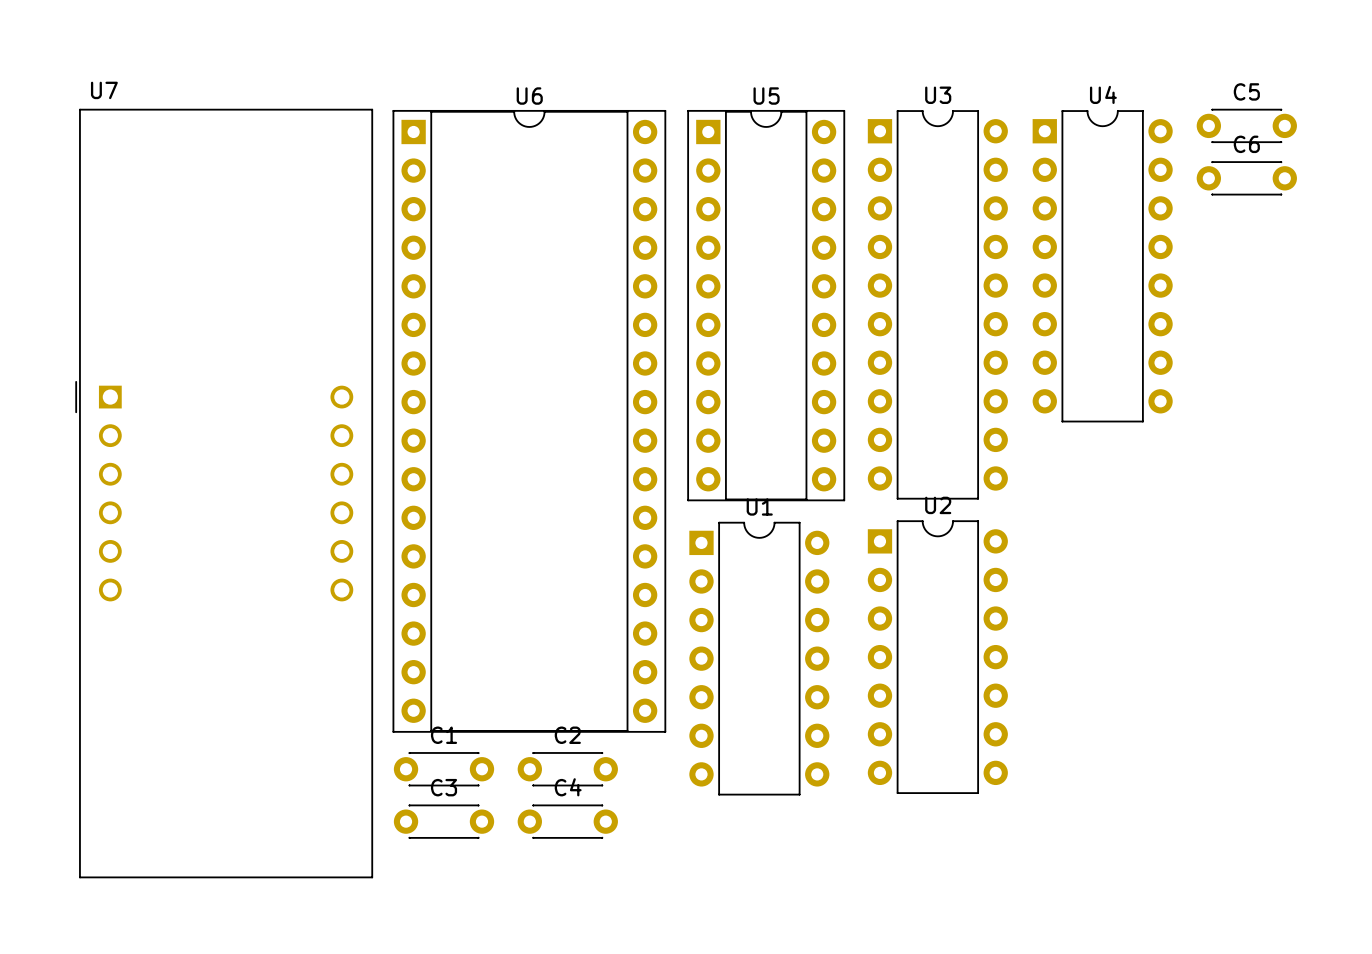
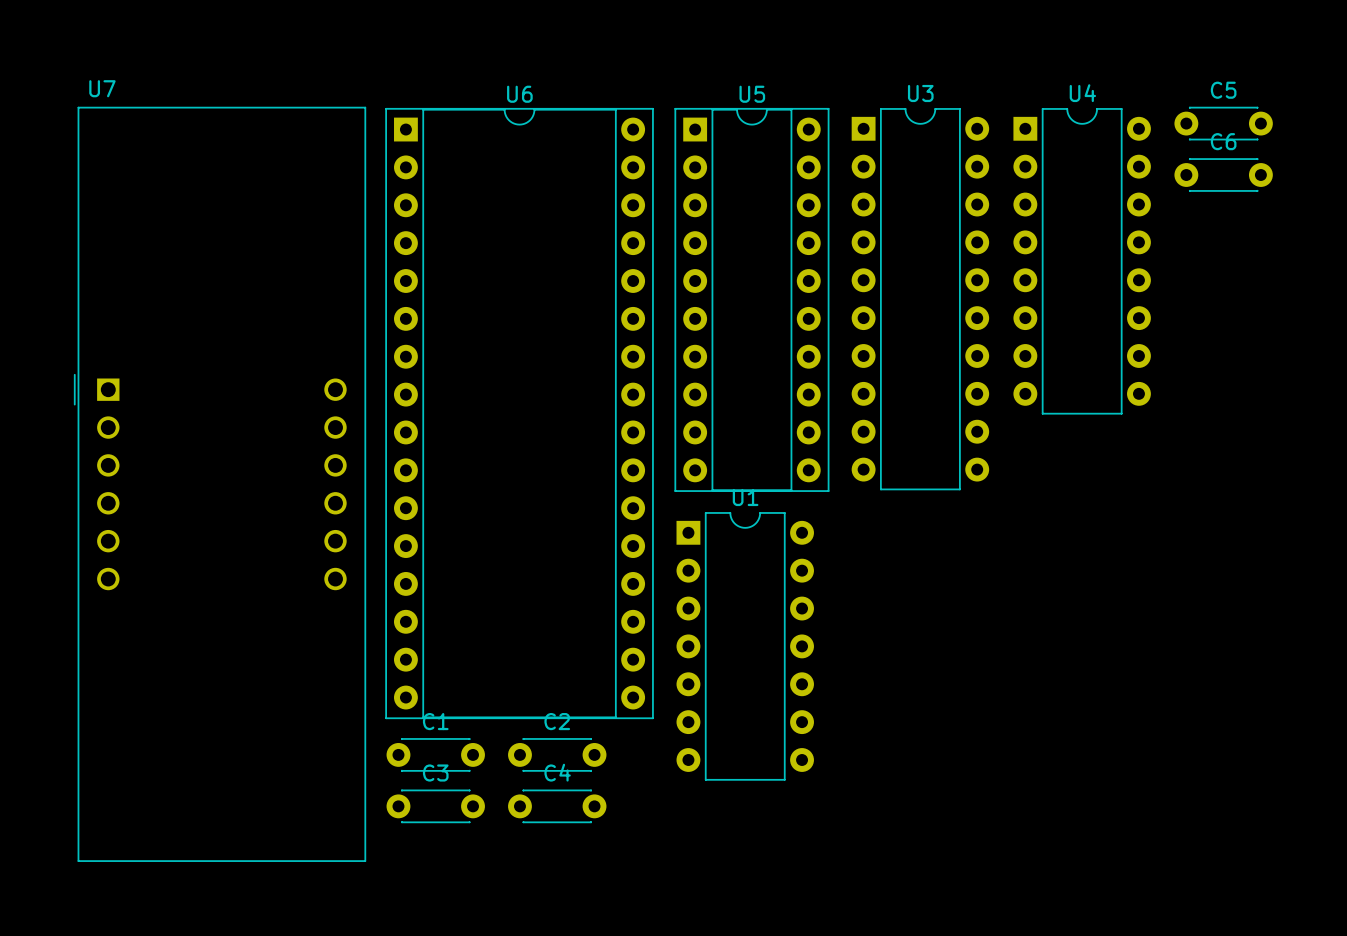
U2: (937, 657) -> none

